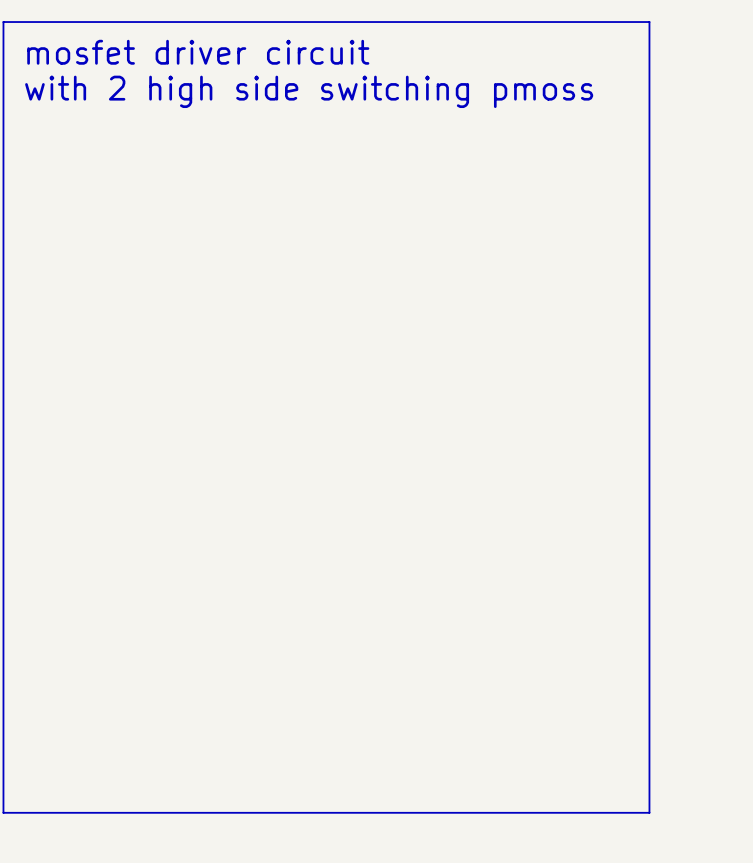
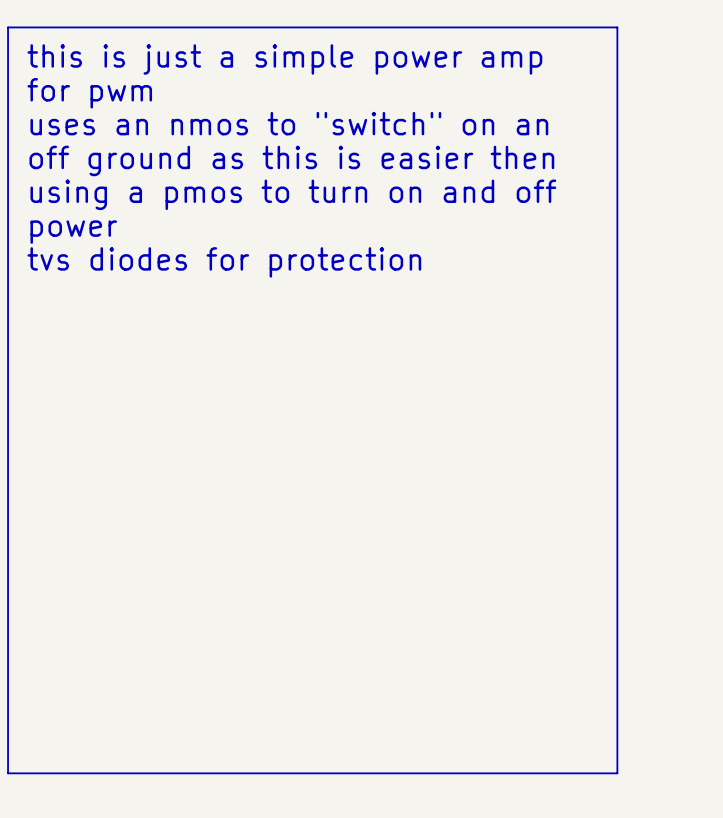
text: mosfet driver circuit (198, 52) -> this is just a simple power amp (284, 59)
text: with 2 high side switching pmoss (309, 91) -> for pwm (89, 93)
text: none -> uses an nmos to "switch" on an (289, 123)
text: none -> off ground as this is easier then (291, 160)
text: none -> using a pmos to turn on and off (293, 194)
text: none -> power (73, 232)
text: none -> tvs diodes for protection (224, 262)

